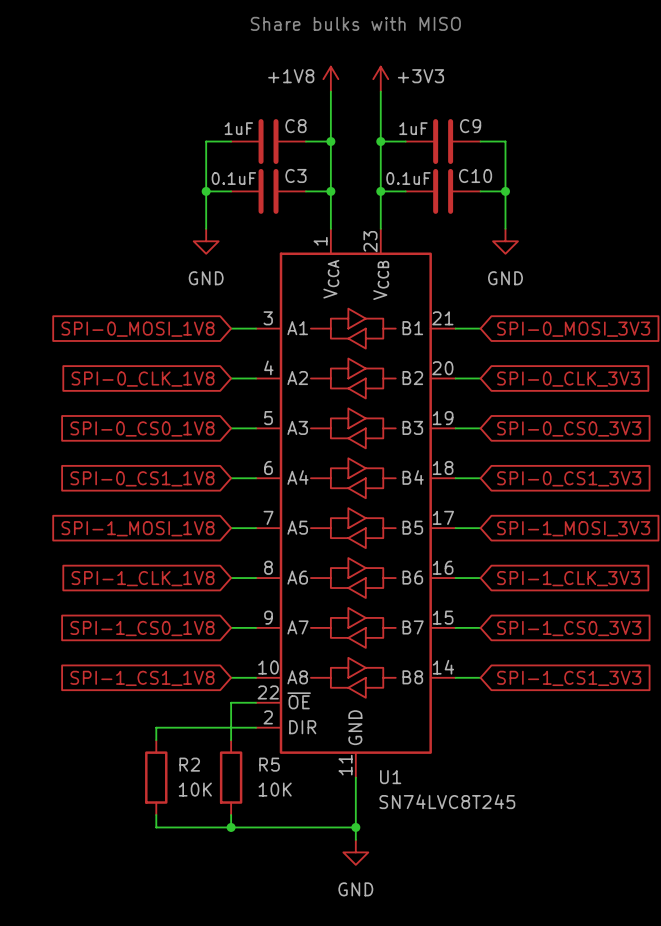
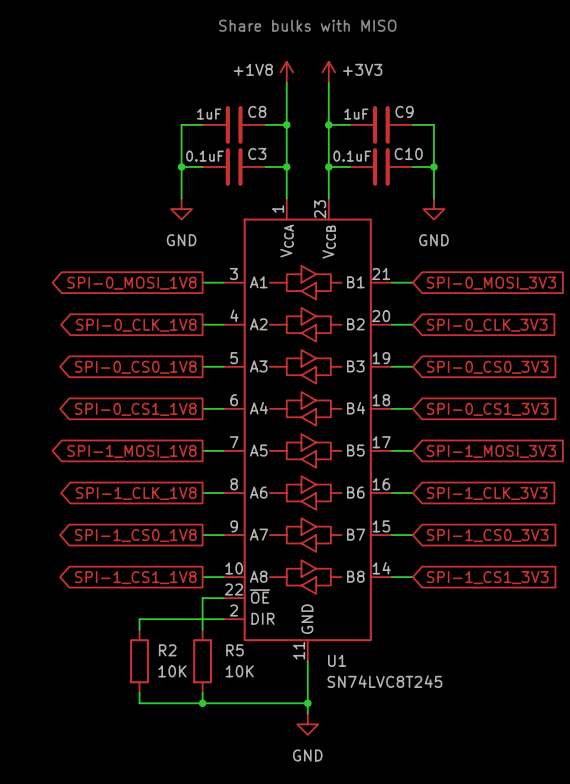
global label shape: input (138, 329) -> output (131, 283)
global label shape: input (143, 379) -> output (136, 325)
global label shape: input (142, 428) -> output (135, 367)
global label shape: input (142, 478) -> output (135, 409)
global label shape: input (138, 528) -> output (131, 451)
global label shape: input (143, 578) -> output (136, 493)
global label shape: input (142, 628) -> output (135, 535)
global label shape: input (142, 678) -> output (135, 577)

